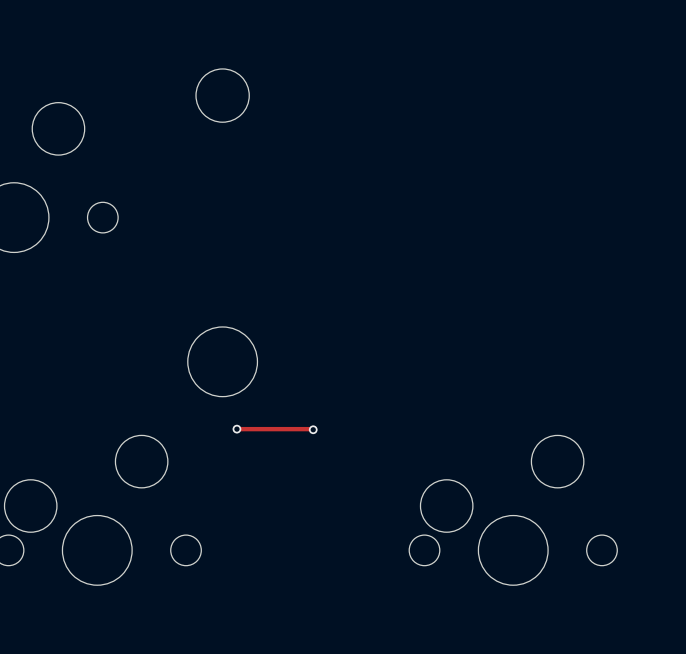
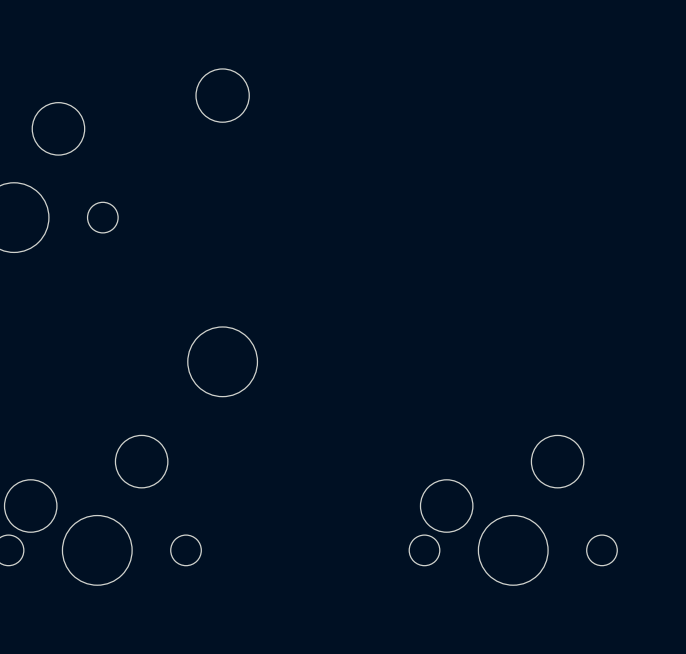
track: (236, 429) (313, 429) -> none
via: (236, 429) -> none
via: (313, 429) -> none

